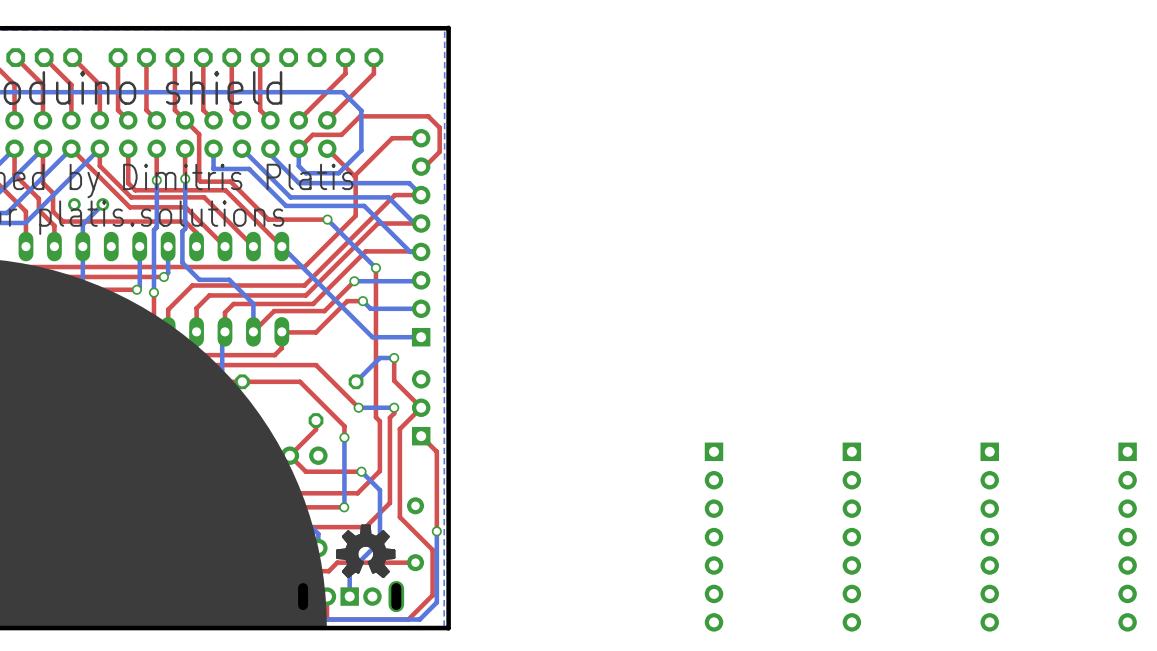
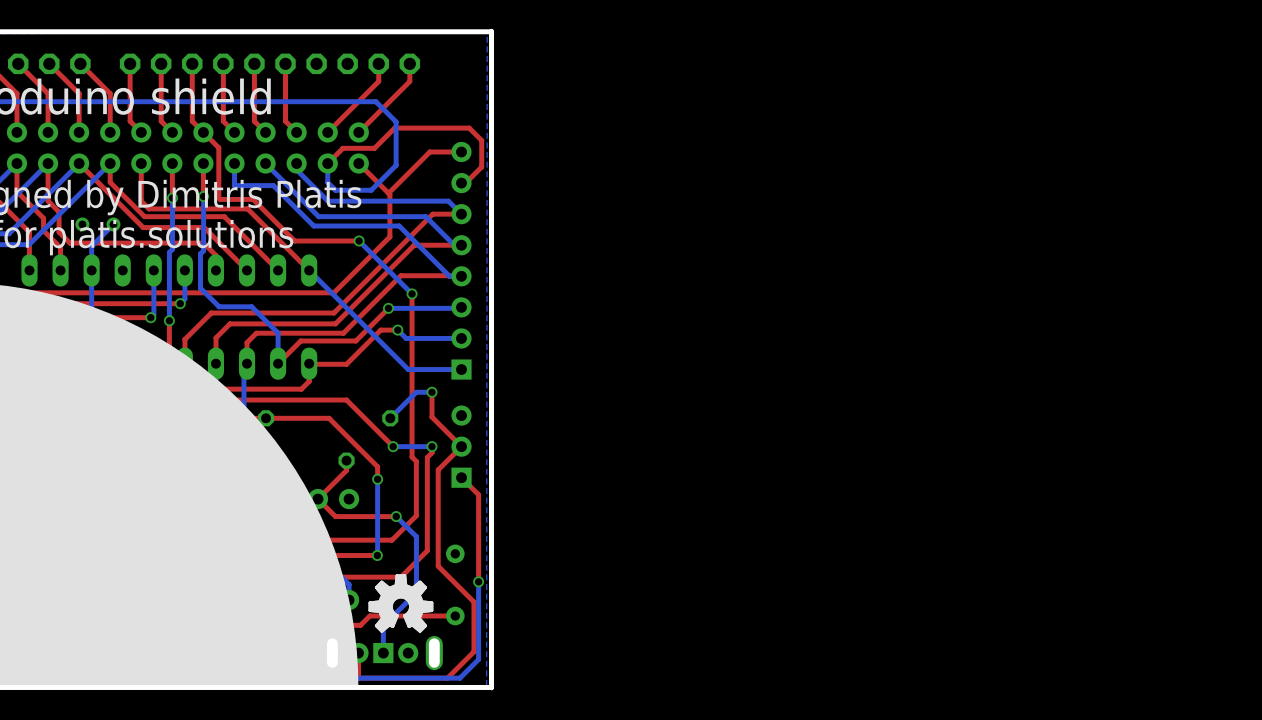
part: (714, 537) -> none
part: (851, 537) -> none
part: (989, 537) -> none
part: (1127, 537) -> none

